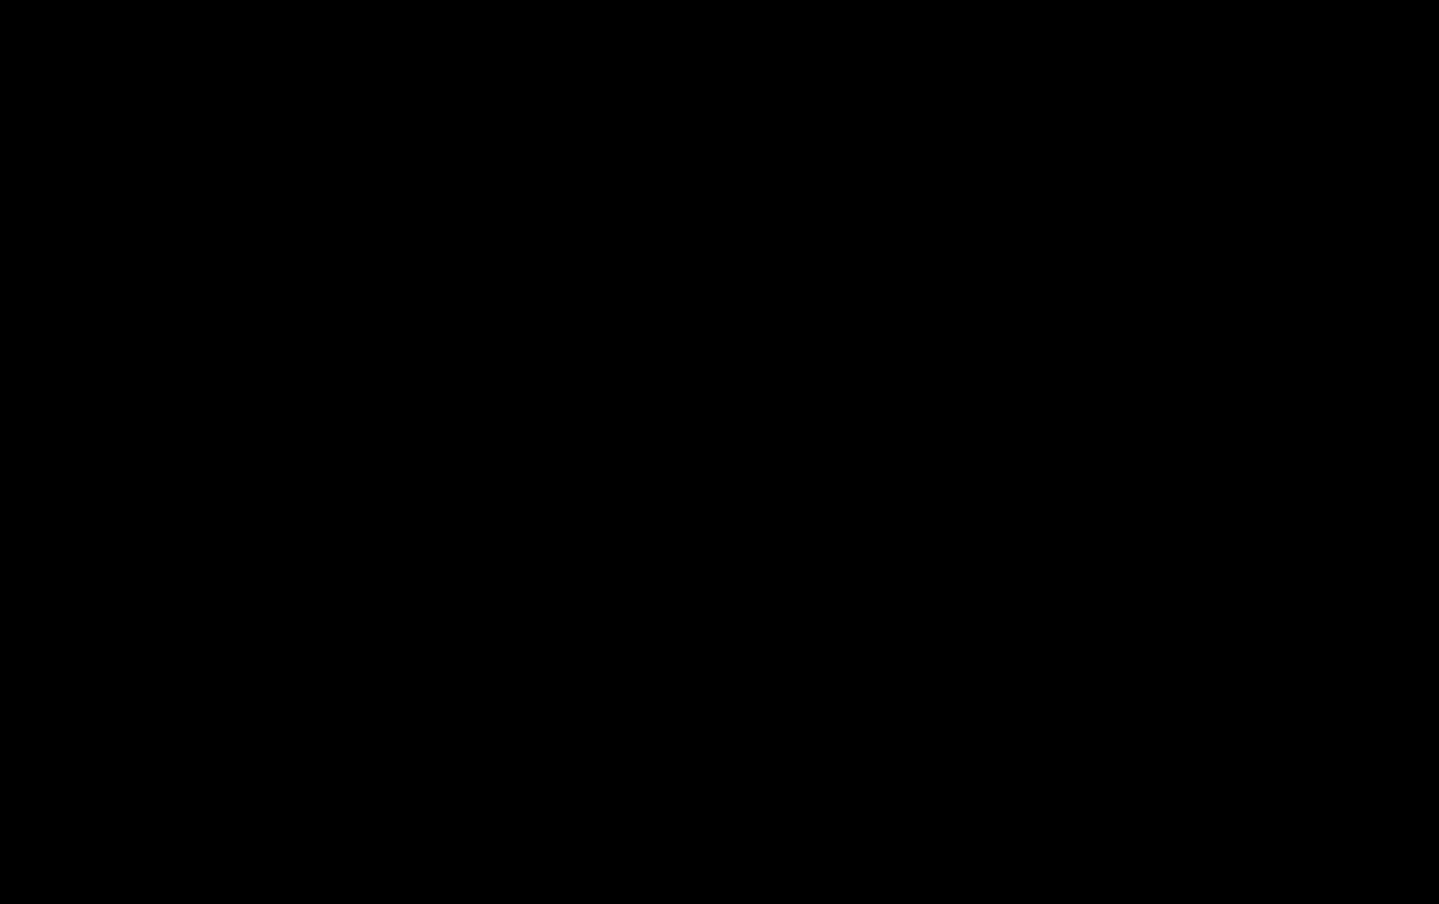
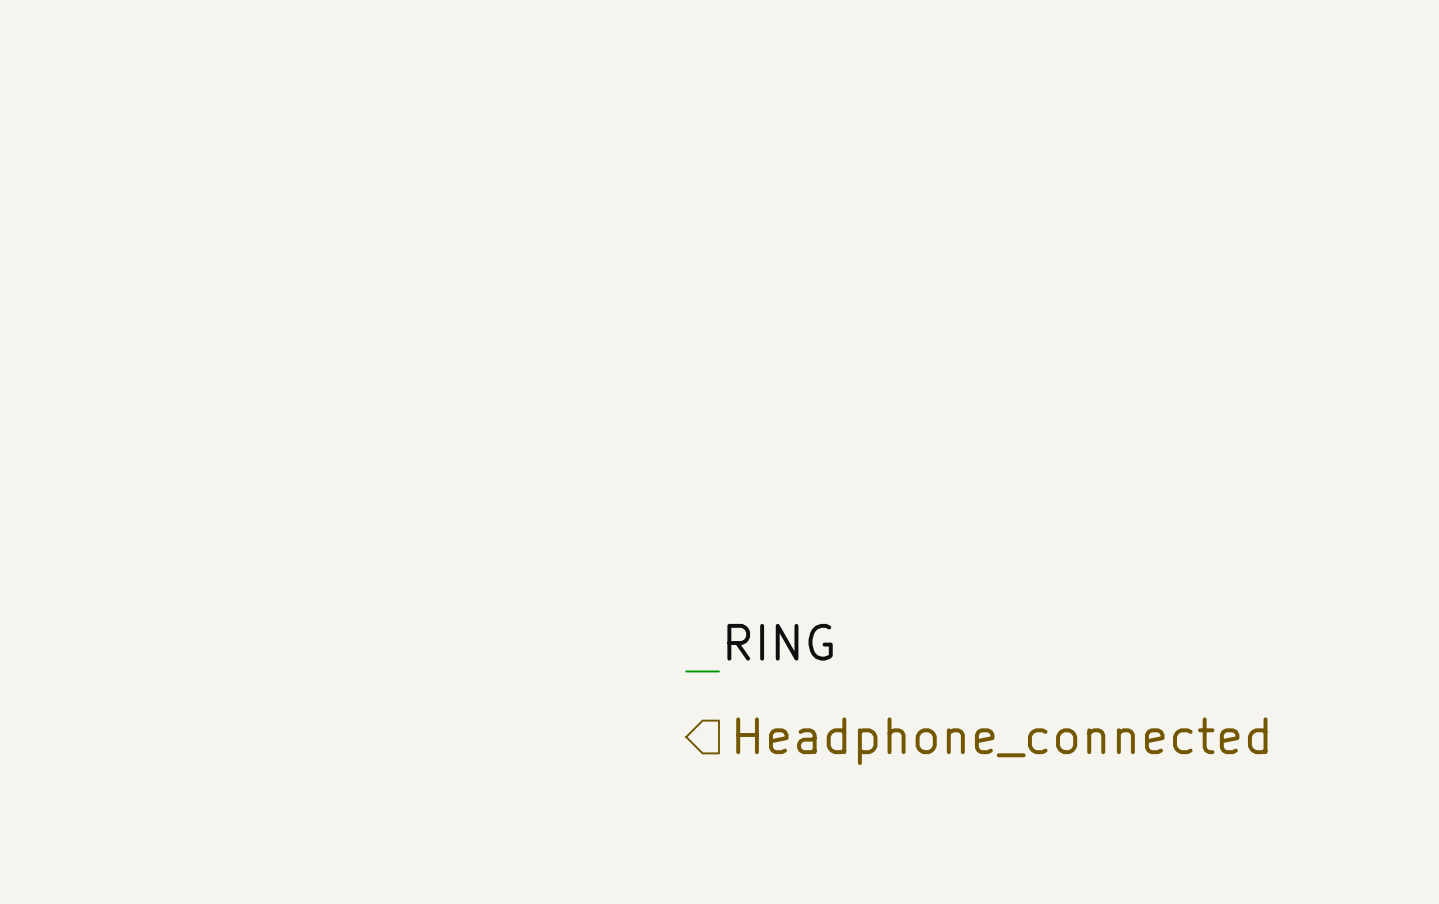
label: none -> RING (780, 642)
wire: none -> (686, 671) (718, 671)
hierarchical label: none -> Headphone_connected (1001, 741)

